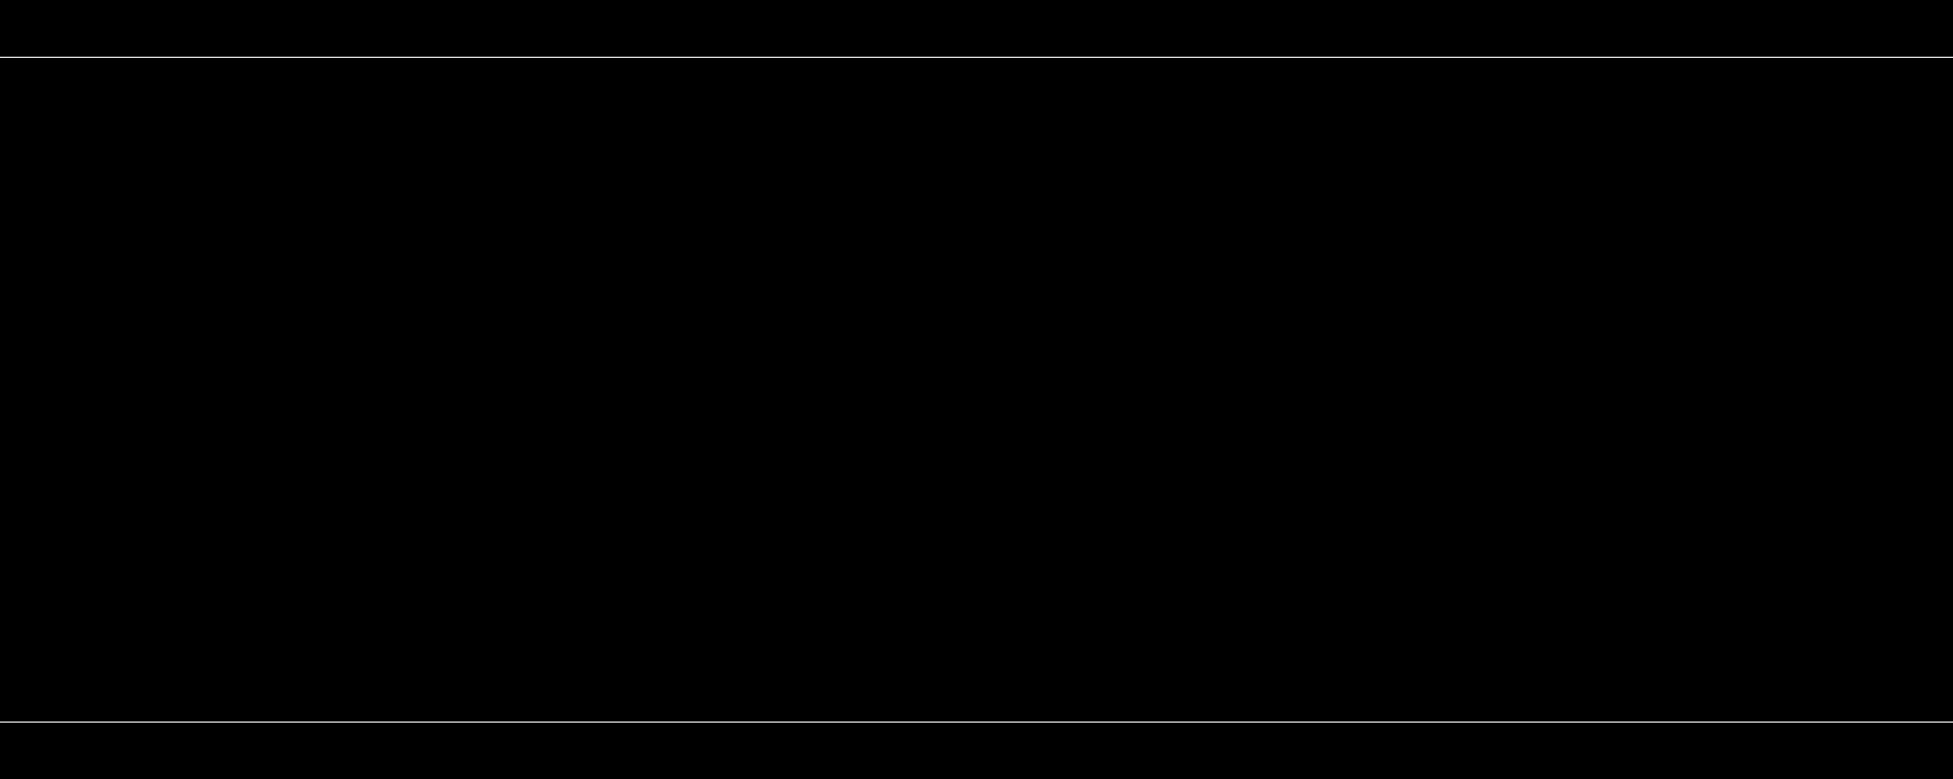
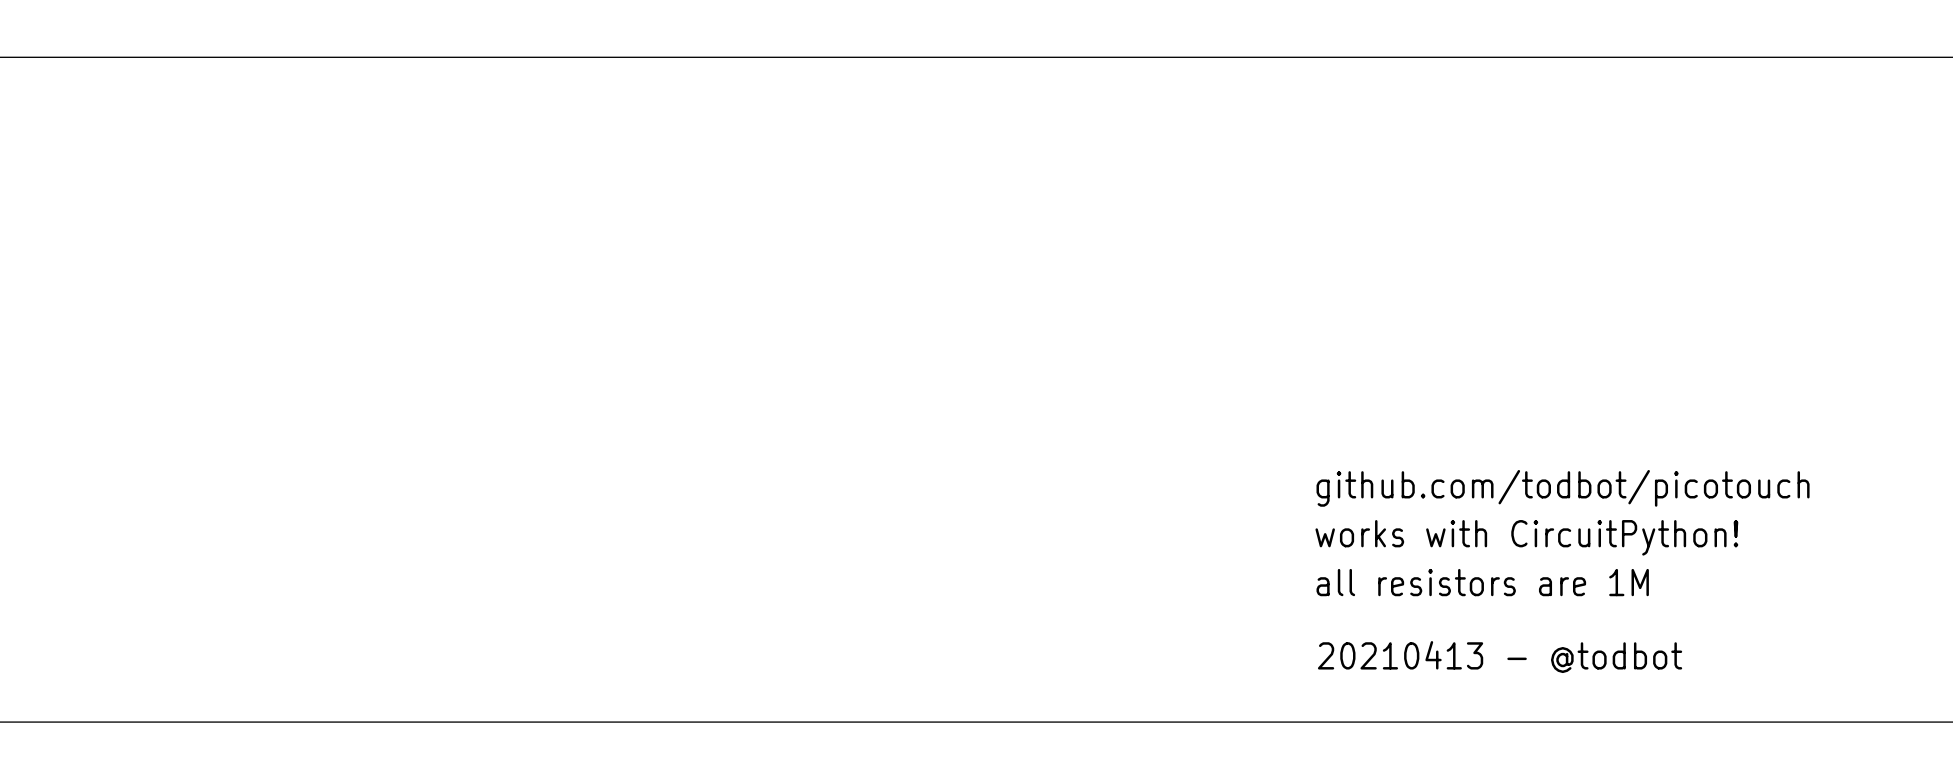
text: none -> github.com/todbot/picotouch (1563, 488)
text: none -> works with CircuitPython! (1526, 537)
text: none -> all resistors are 1M (1482, 582)
text: none -> 20210413 - @todbot (1500, 657)

